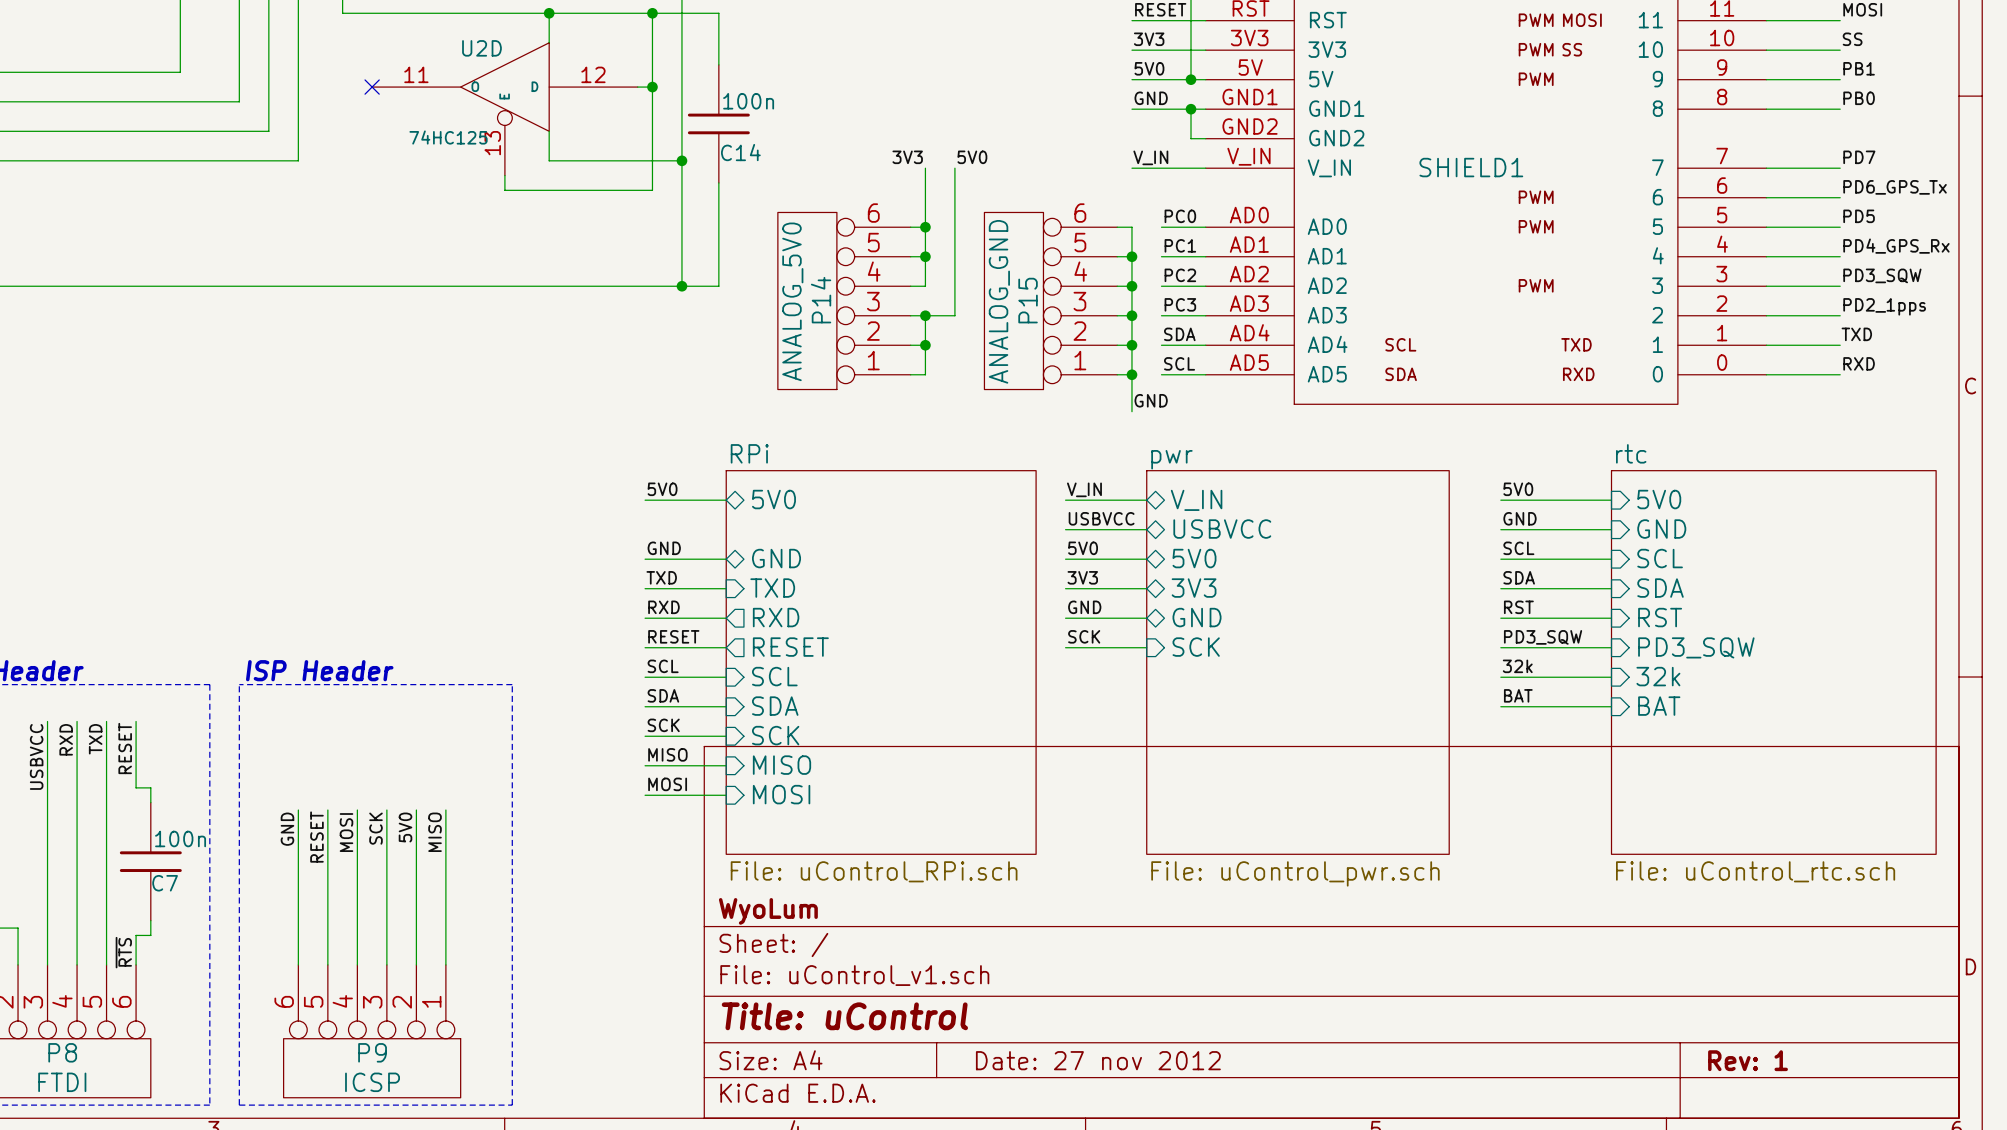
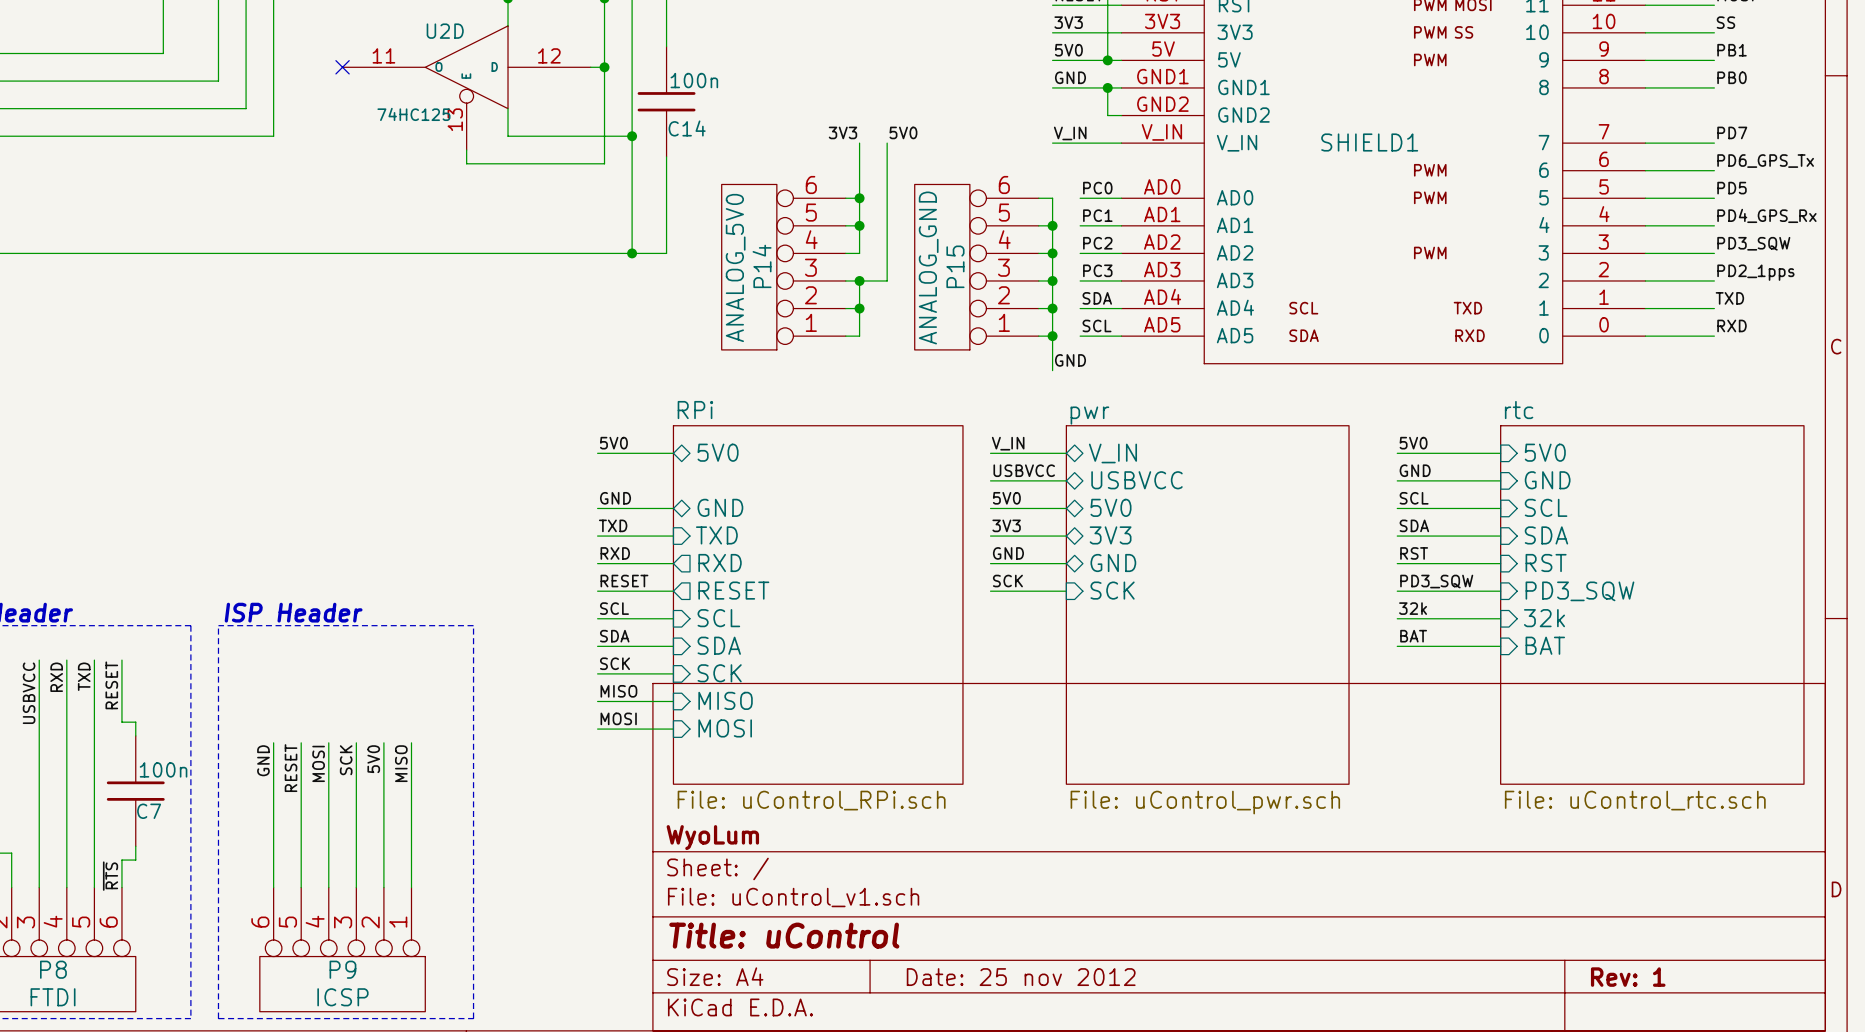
title block: Date: 27 nov 2012 (1098, 1060) -> Date: 25 nov 2012 (1021, 977)

